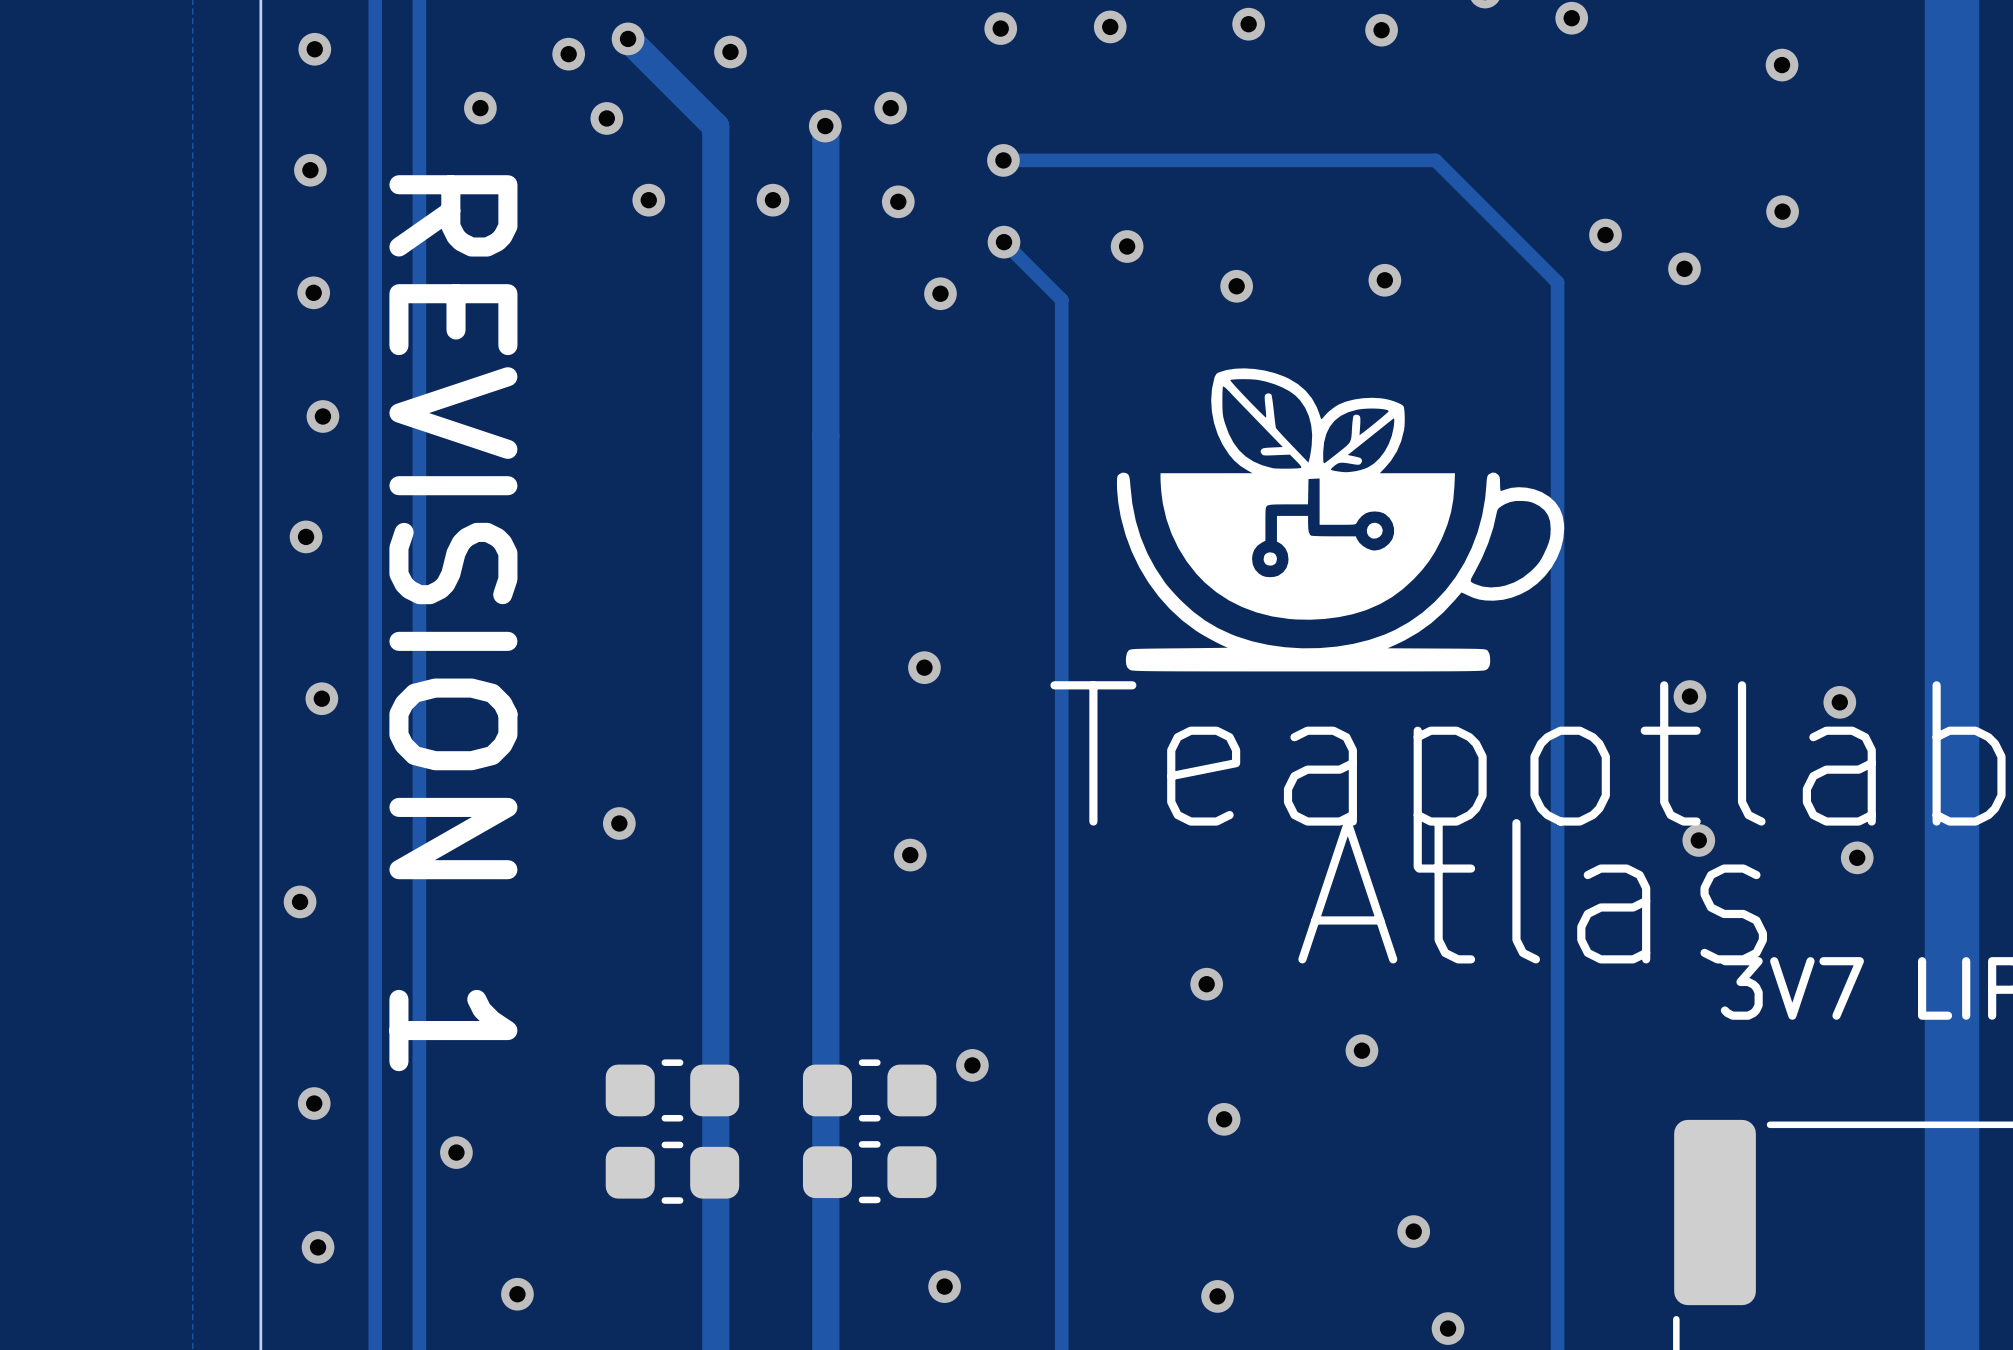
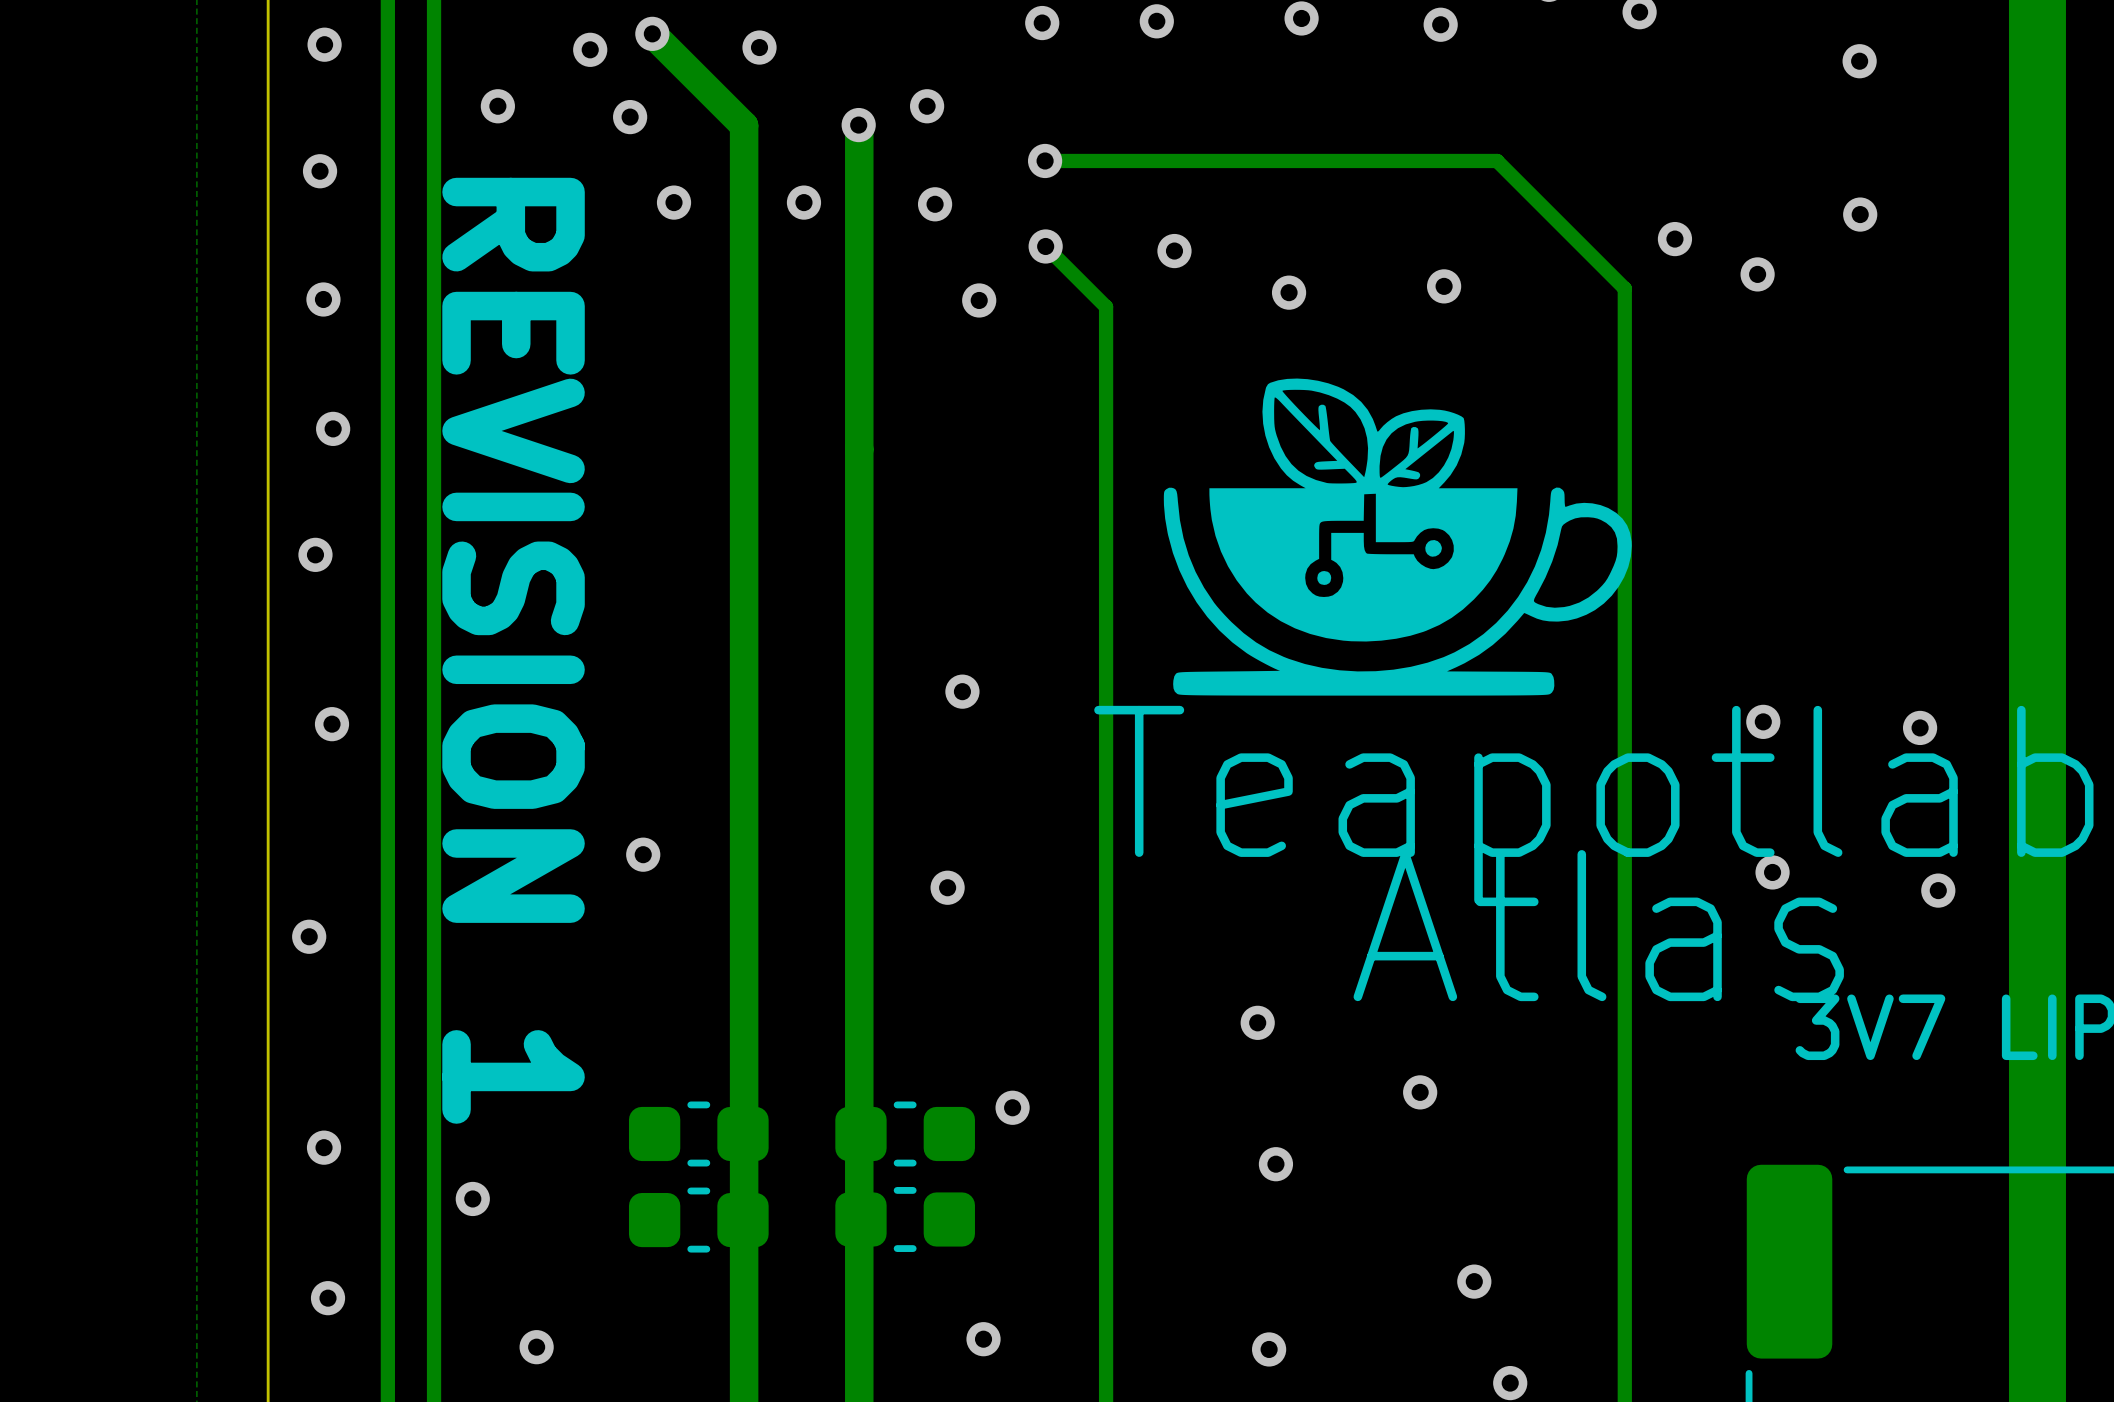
text position: REVISION 1 (453, 623) -> REVISION 1 (513, 650)

